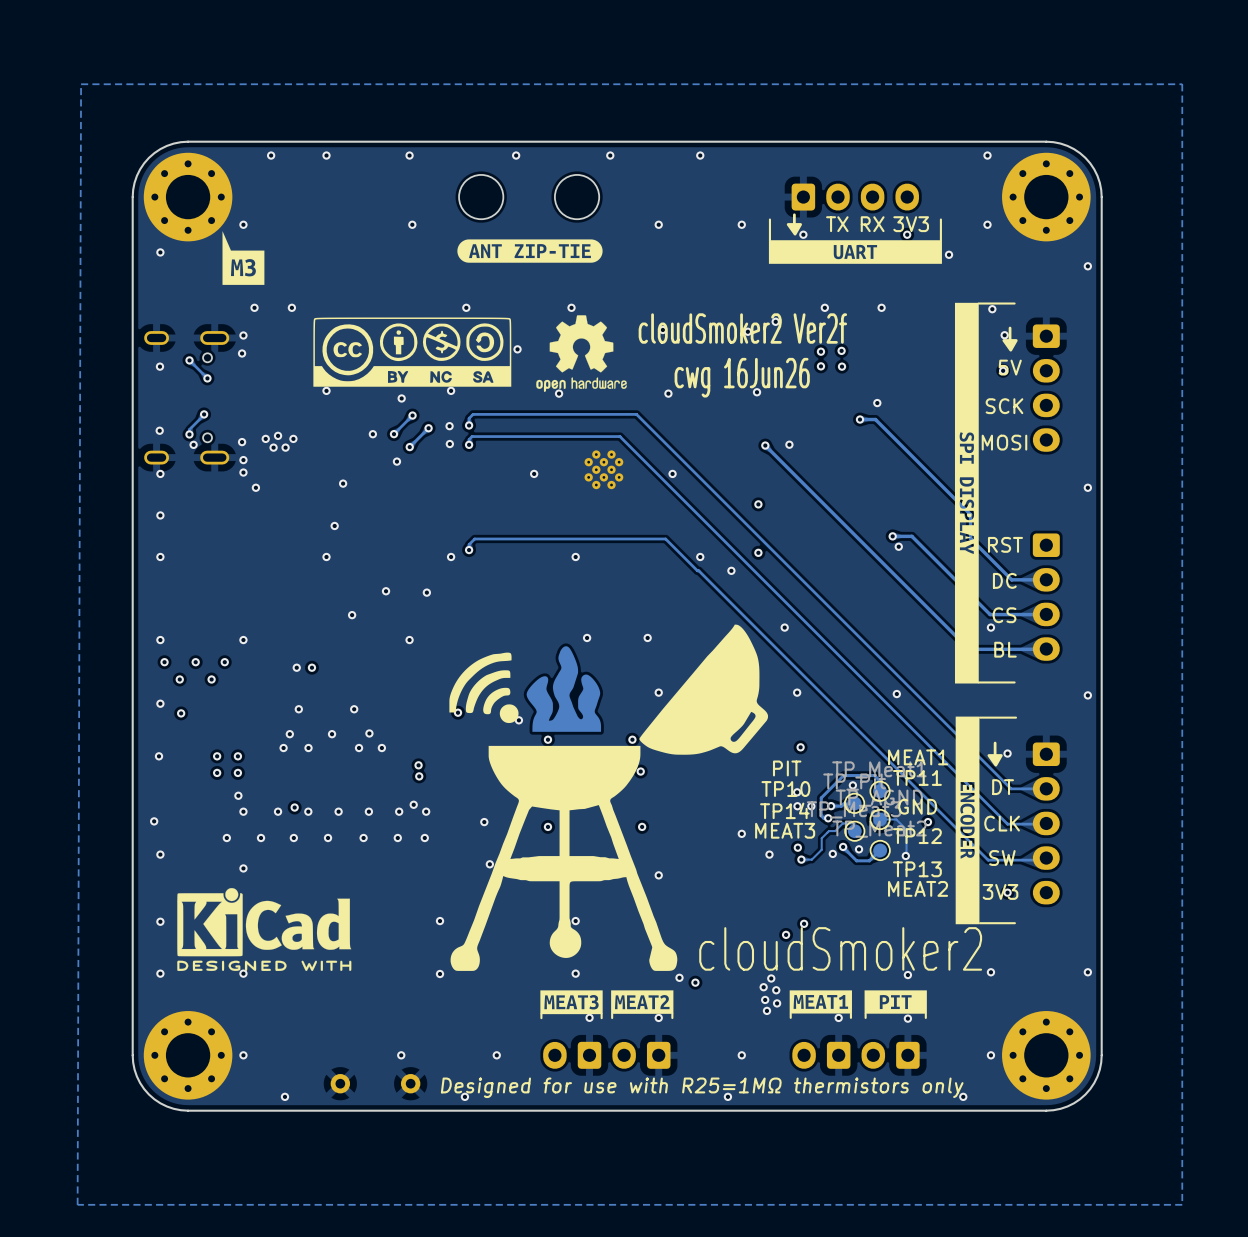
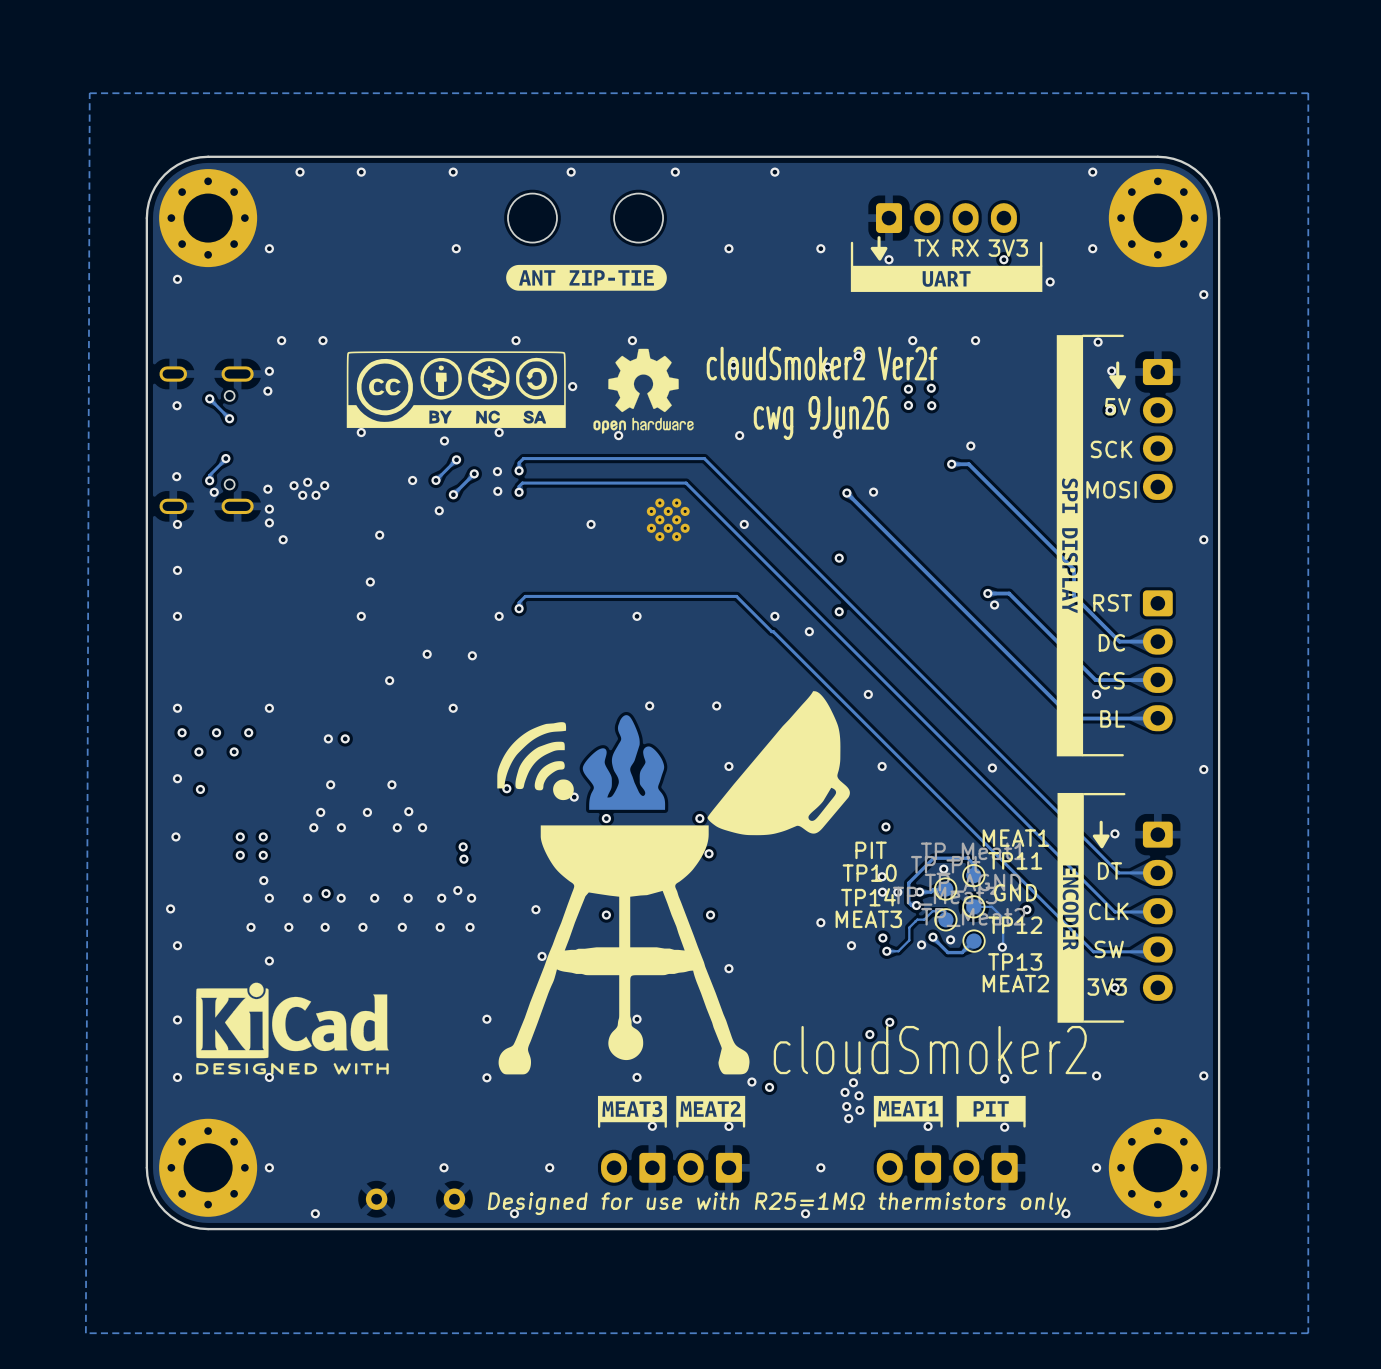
drawing: [222, 231, 265, 285] -> none
text: cwg 16Jun26 (742, 377) -> cwg 9Jun26 (821, 417)

